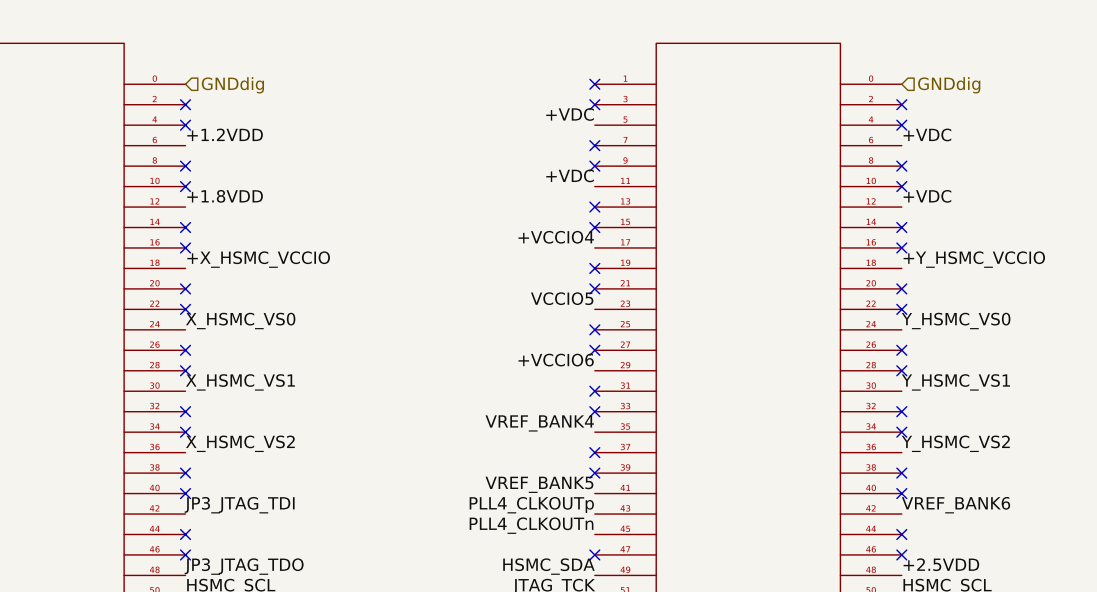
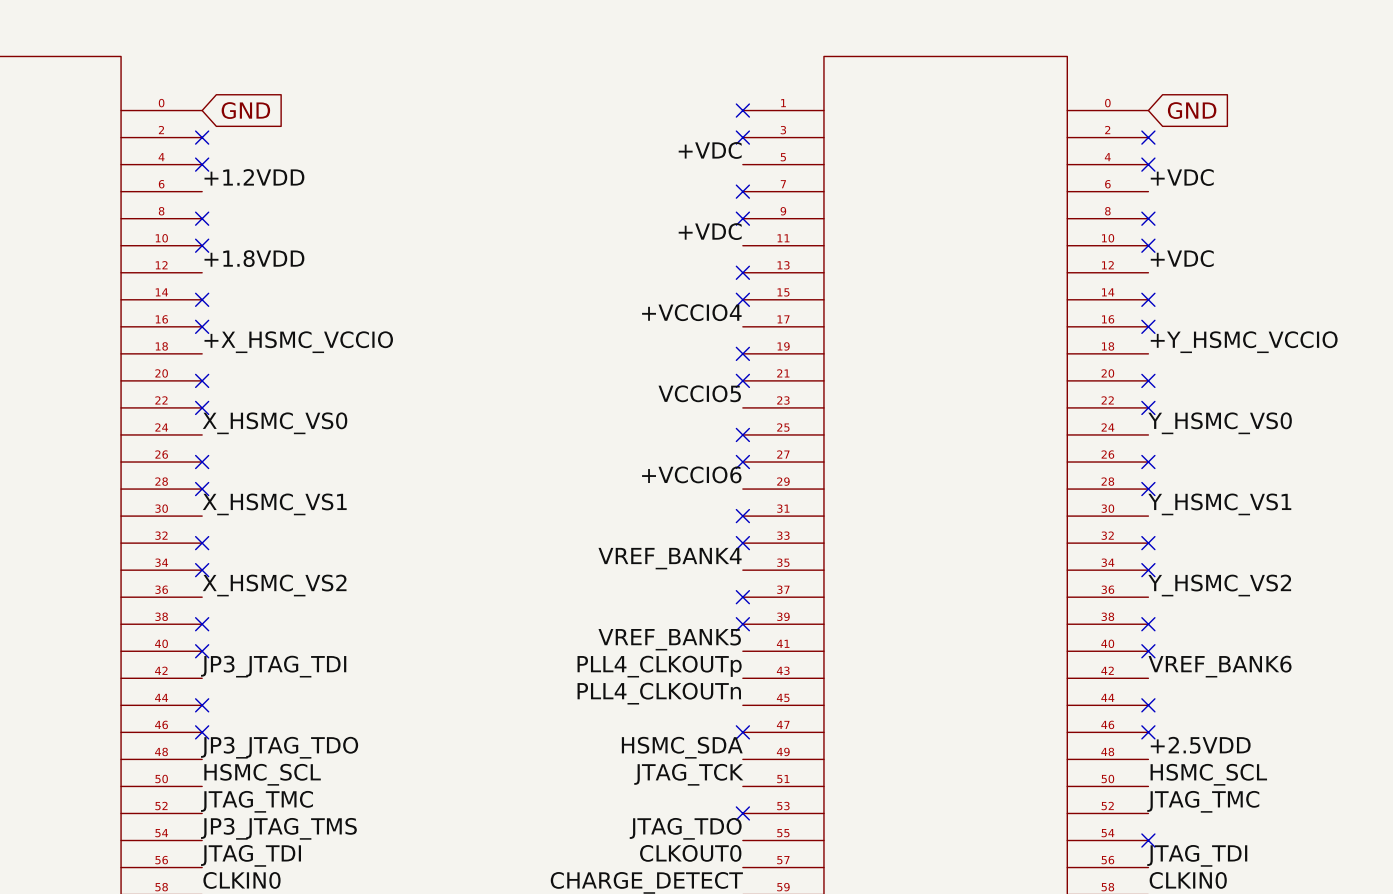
global label: none -> GND (245, 110)
global label: none -> GND (1192, 110)
hierarchical label: GNDdig (232, 85) -> none
hierarchical label: GNDdig (949, 85) -> none

